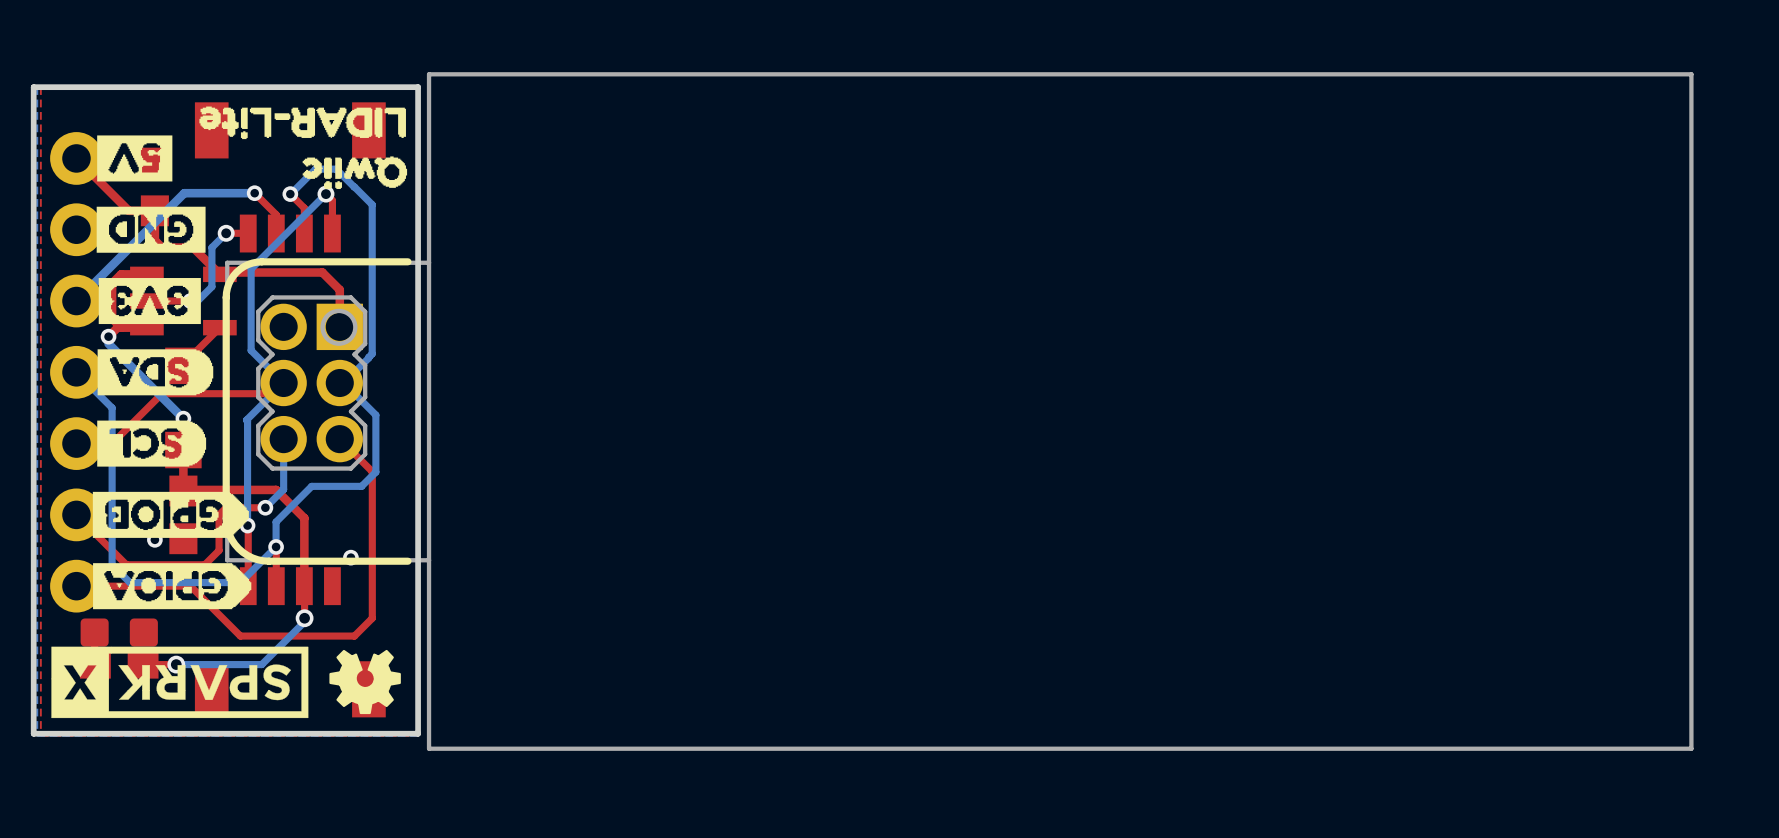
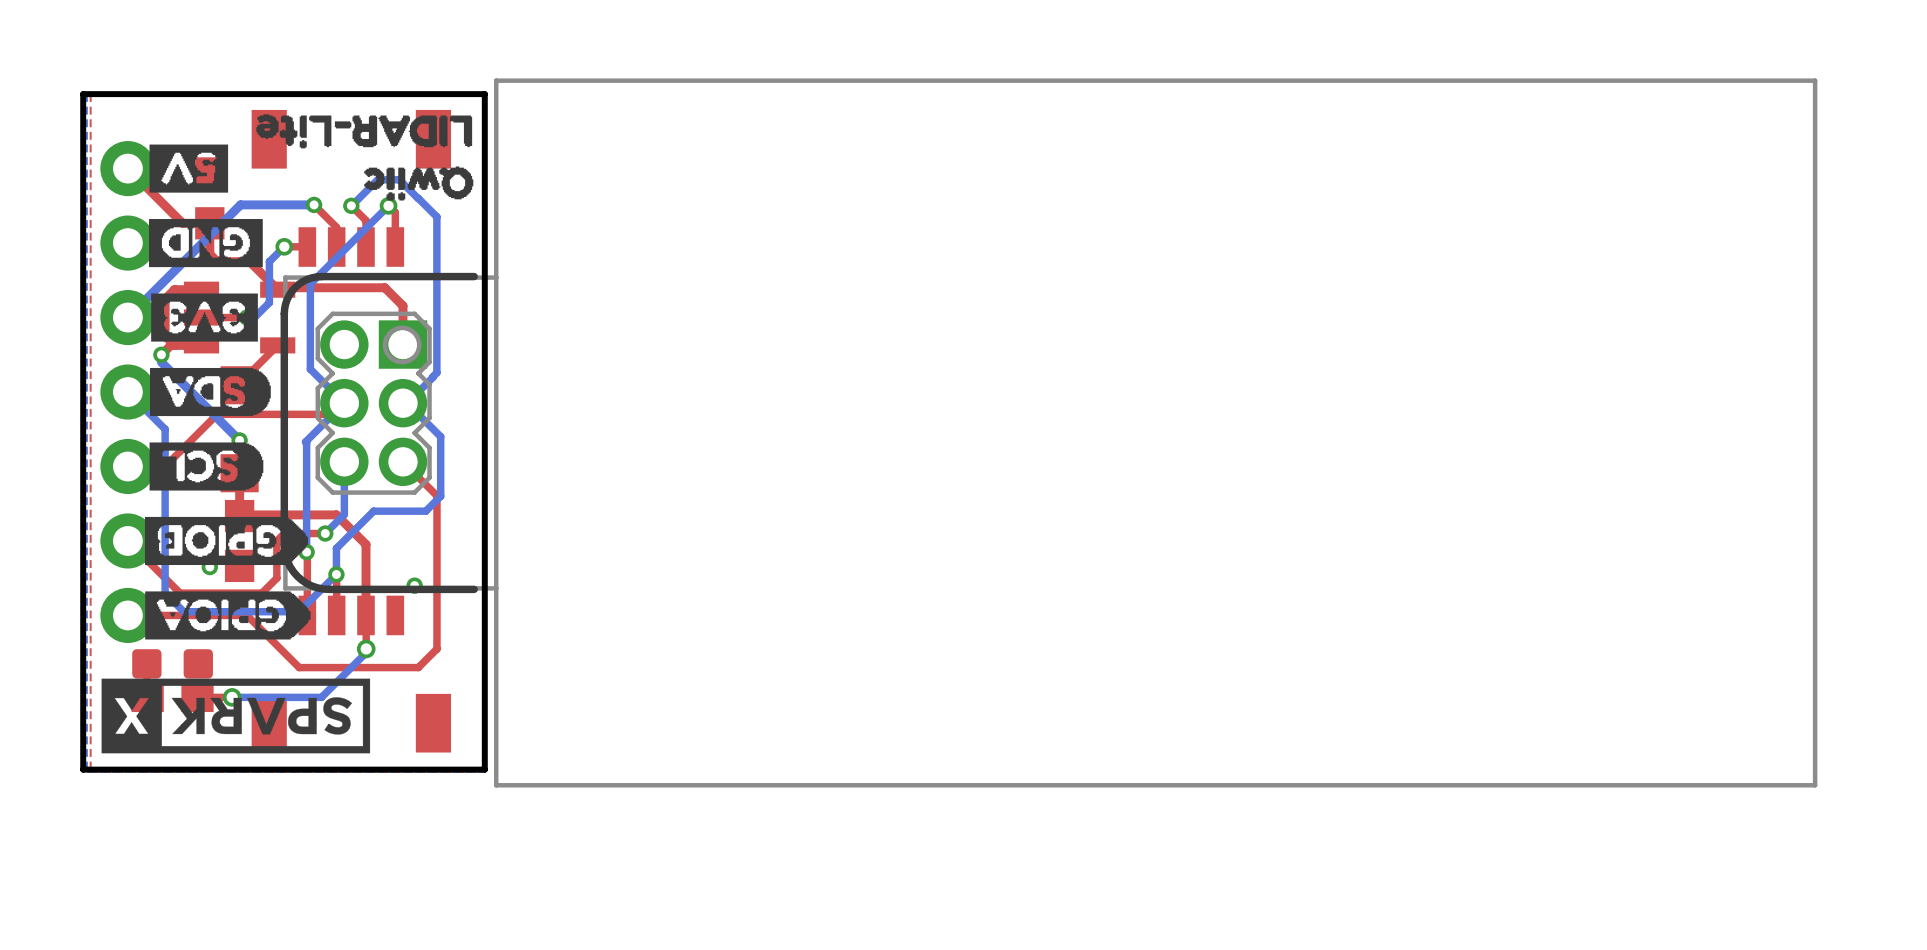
drawing: [329, 649, 401, 715] -> none

